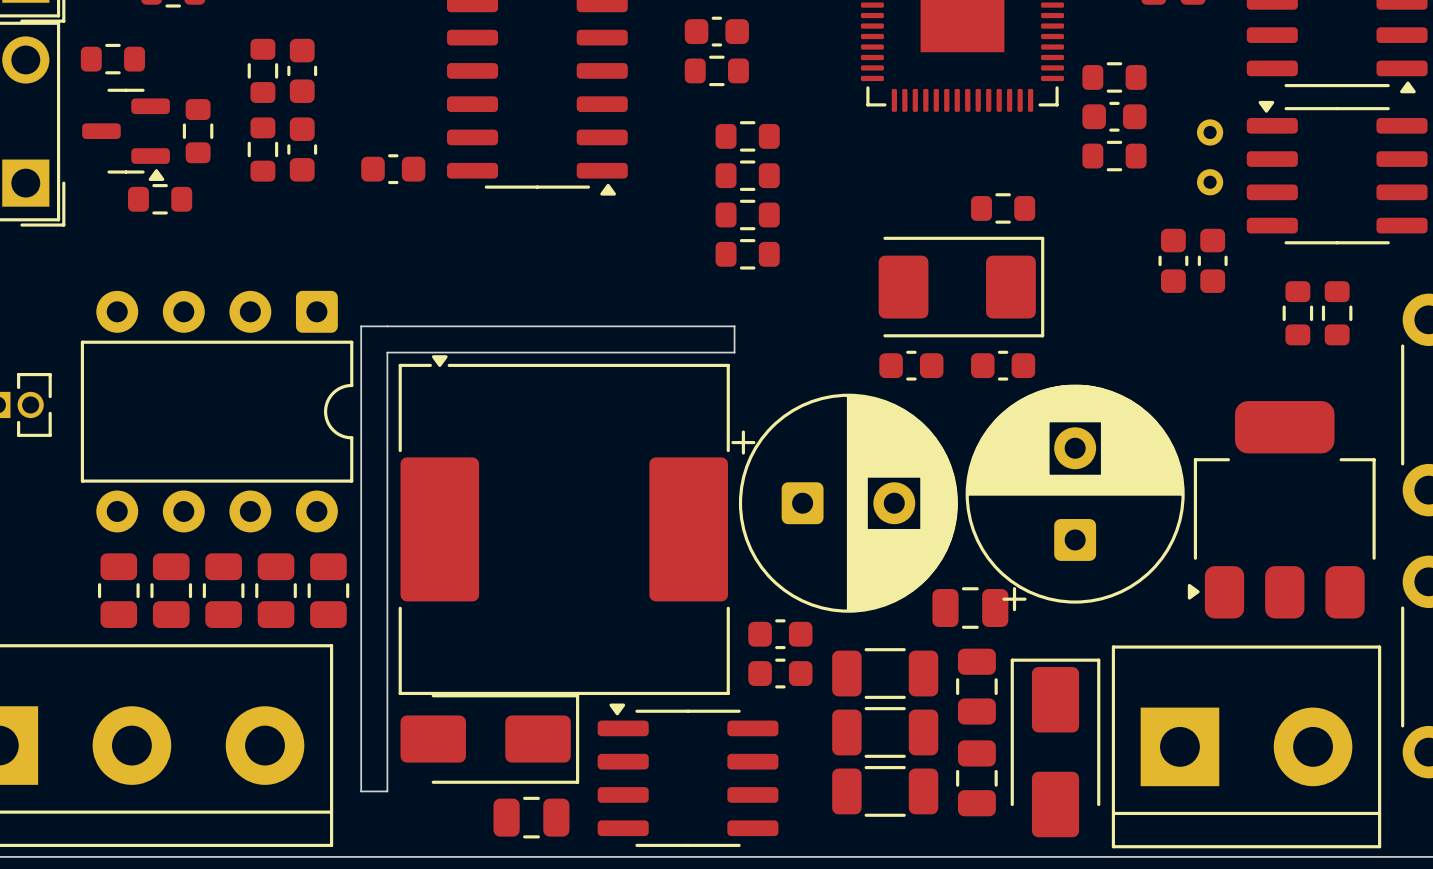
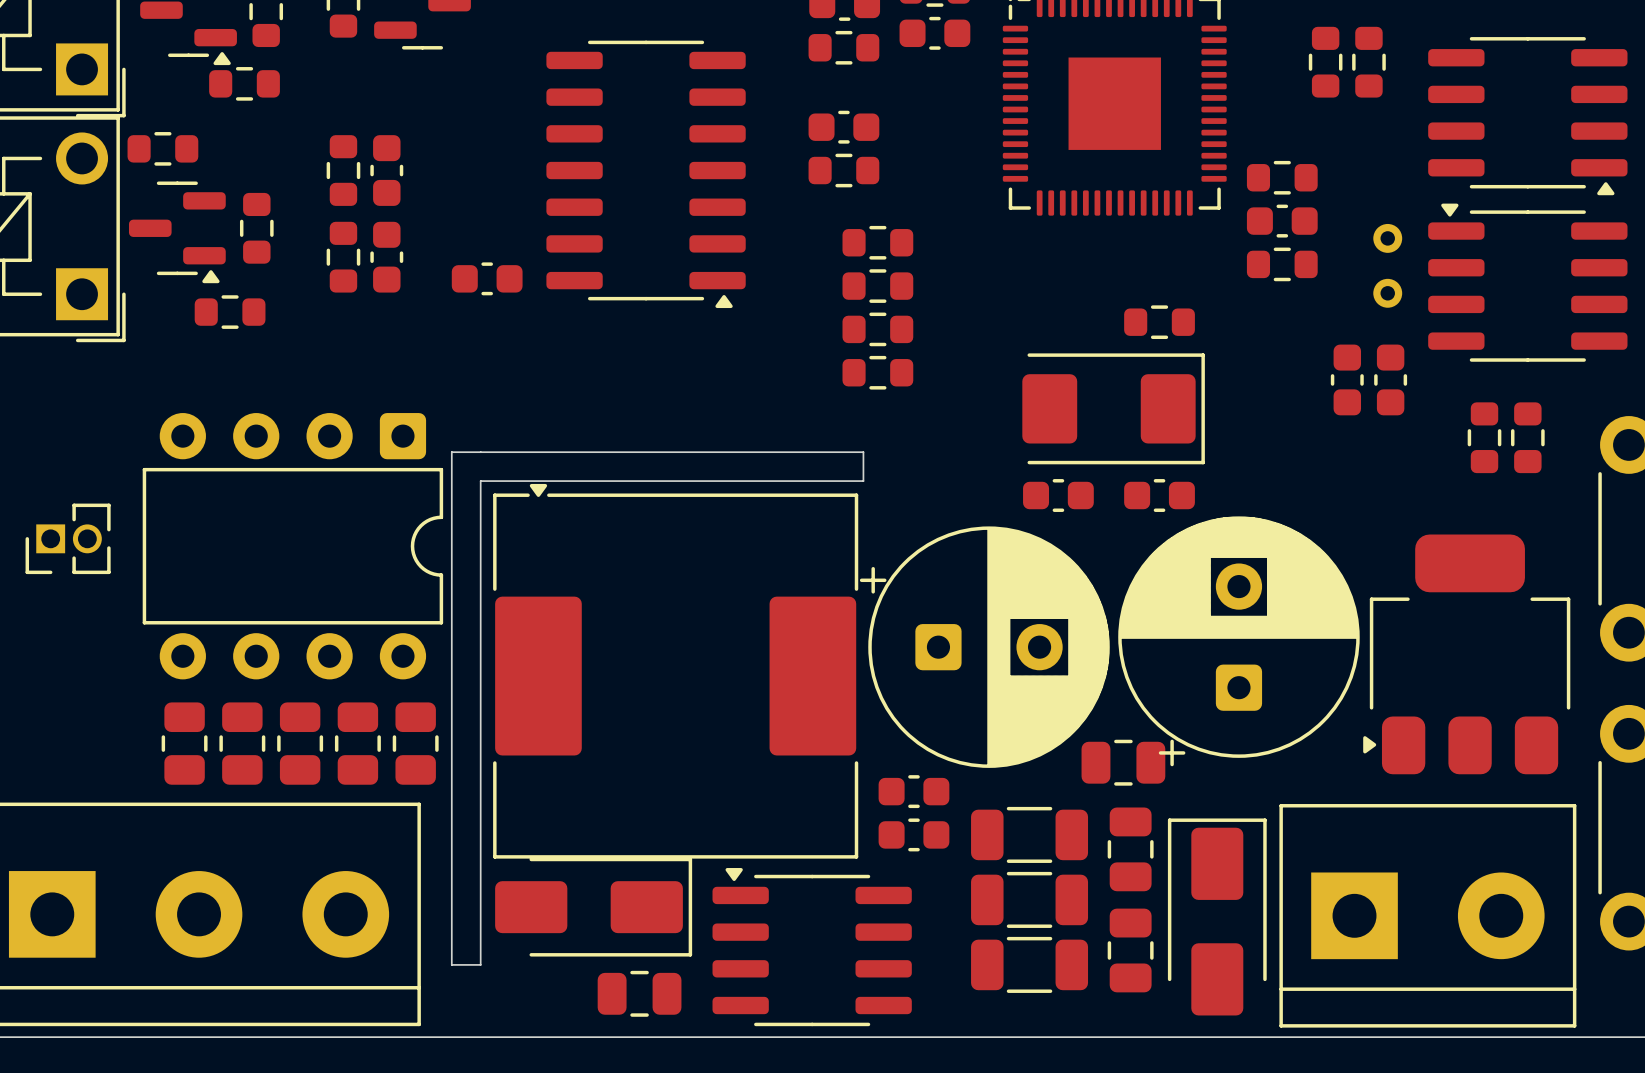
part position: (112, 59) -> (162, 148)
part position: (198, 131) -> (256, 228)
part position: (126, 134) -> (177, 232)

